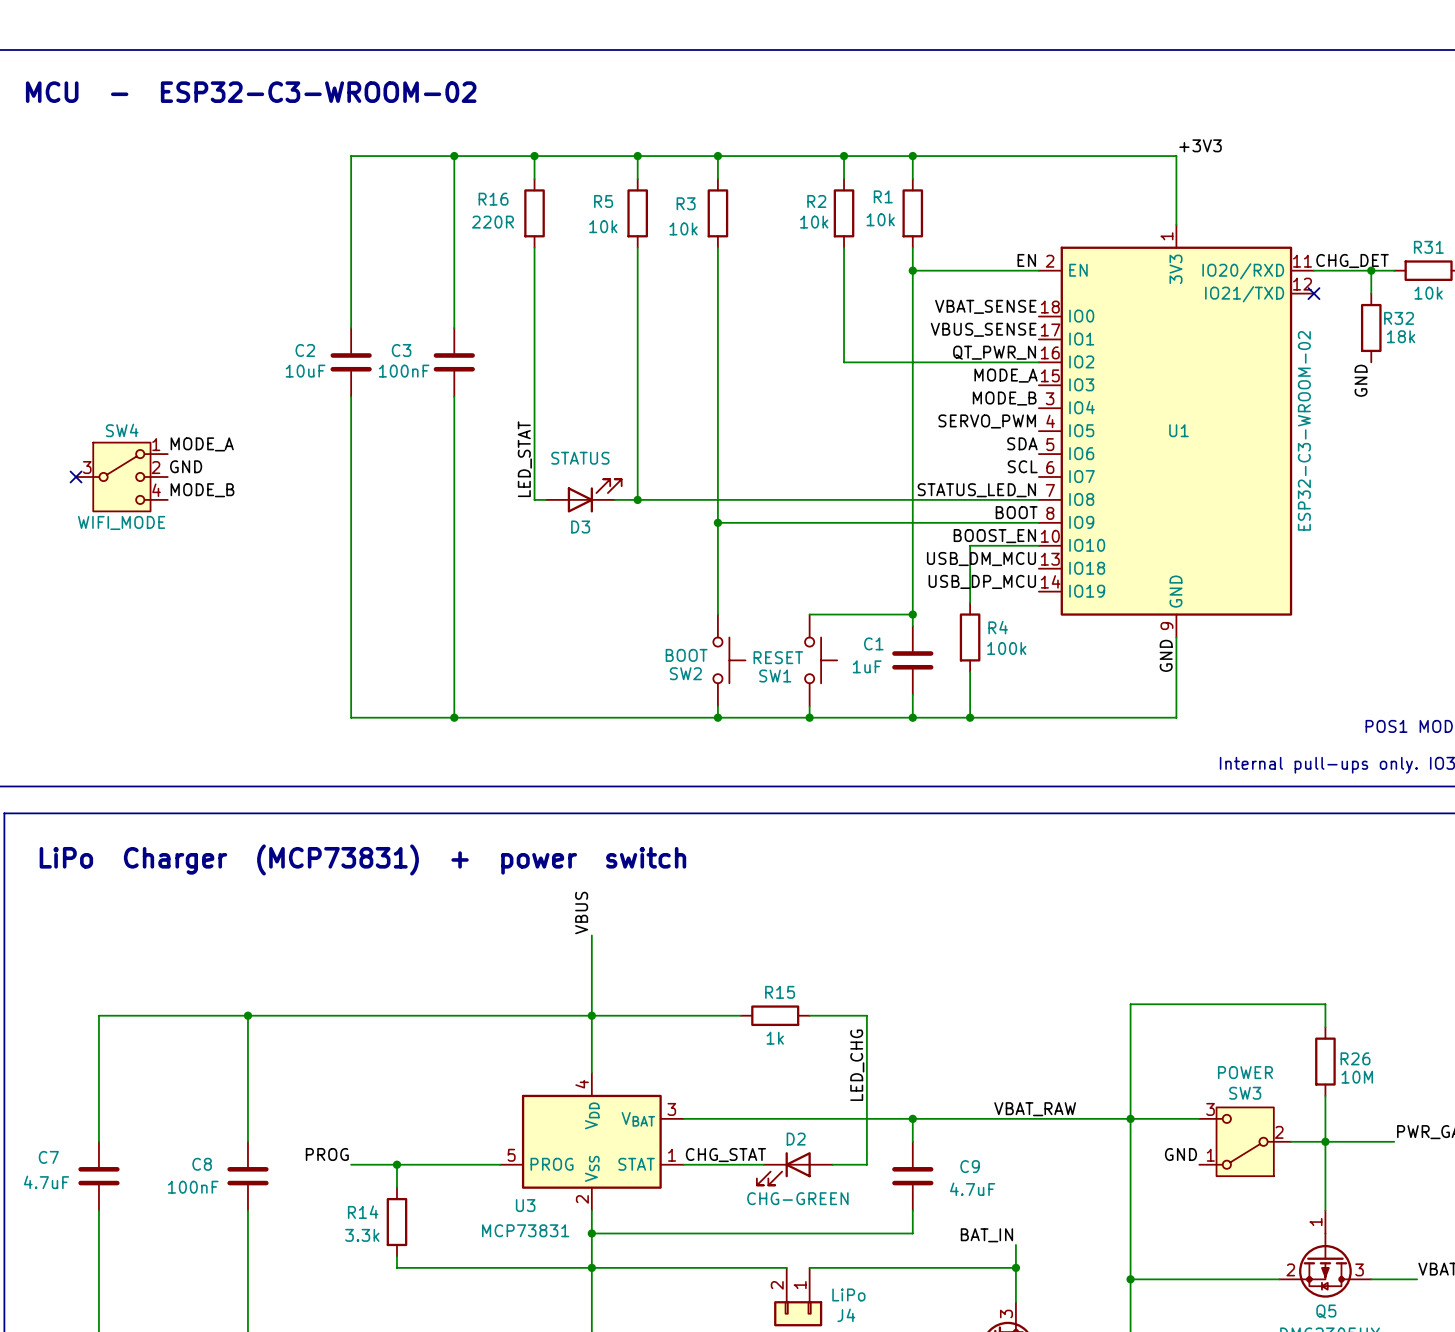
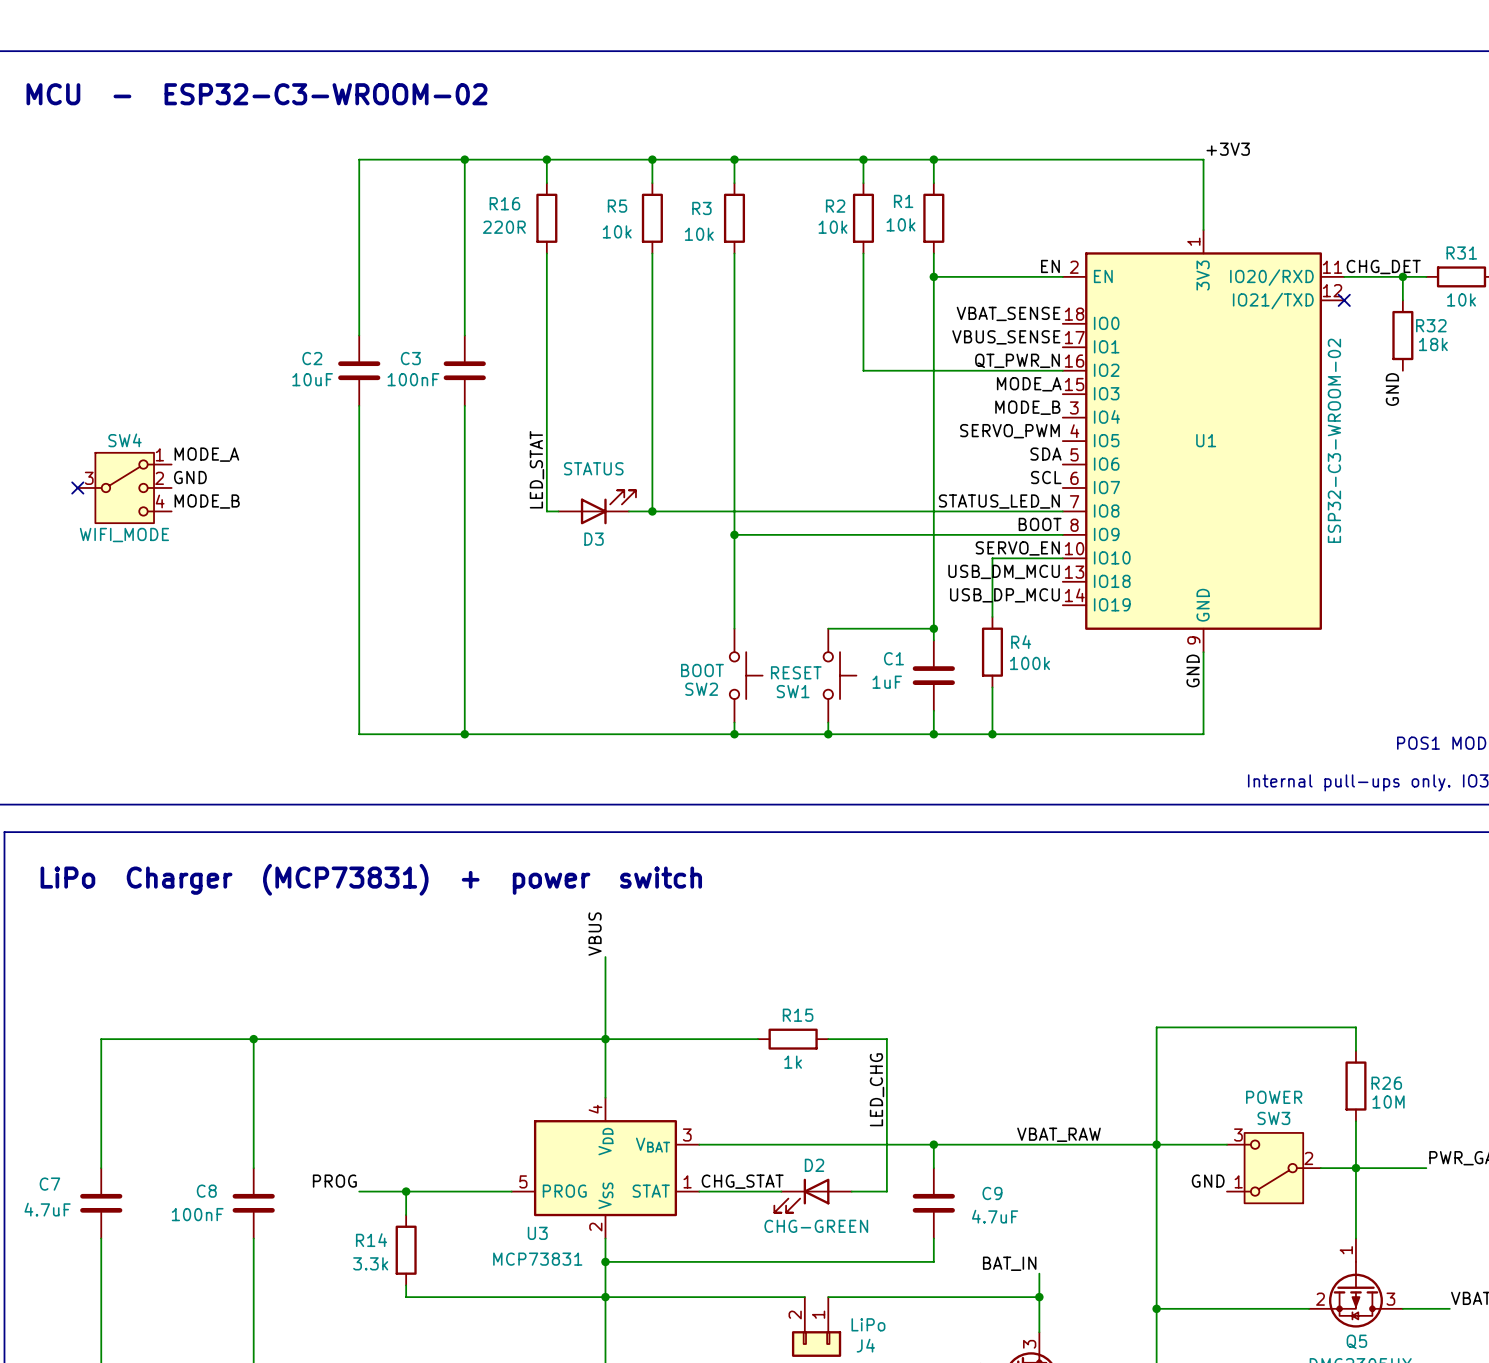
label: BOOST_EN (994, 536) -> SERVO_EN (1017, 548)

